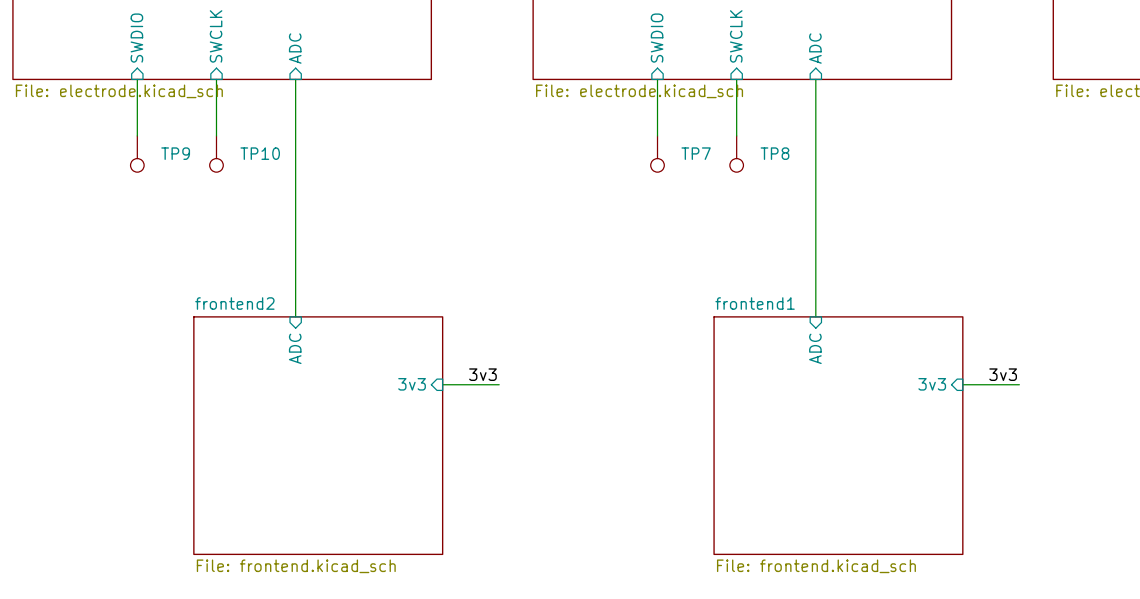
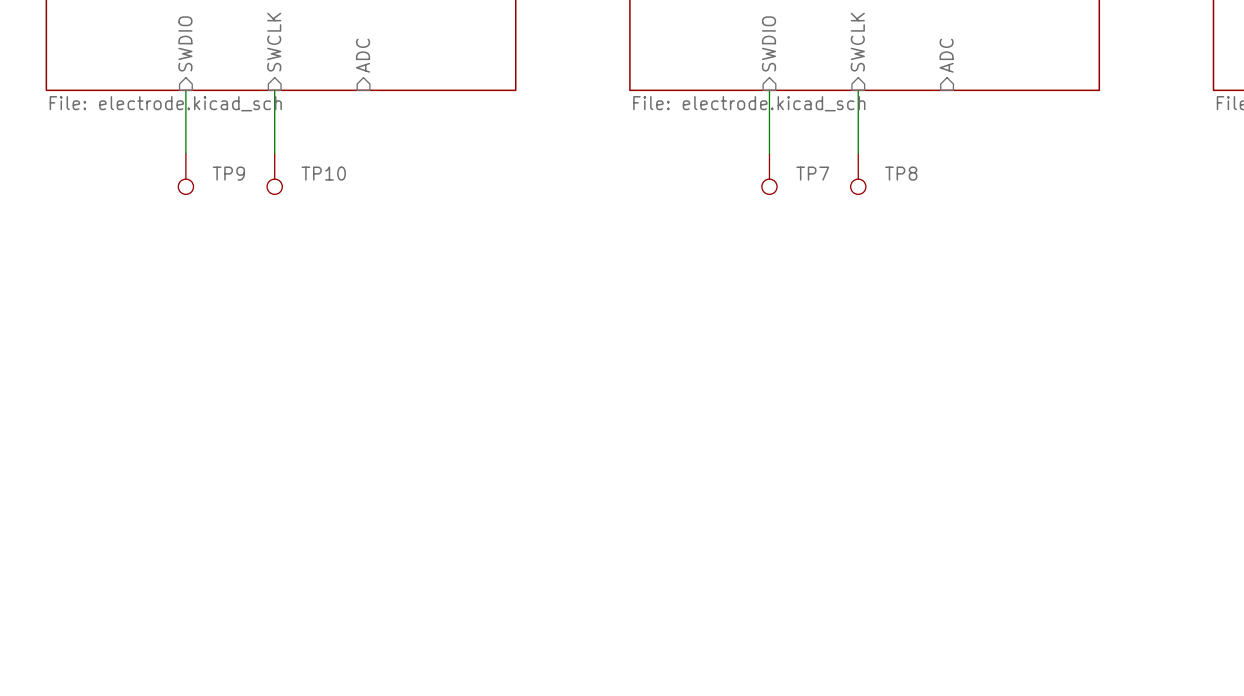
wire: (295, 79) (295, 316) -> none
wire: (815, 79) (815, 316) -> none
sheet pin: ADC (295, 348) -> none
sheet pin: ADC (815, 348) -> none
label: 3v3 (482, 374) -> none
label: 3v3 (1003, 374) -> none
sheet pin: 3v3 (412, 384) -> none
wire: (442, 384) (499, 384) -> none
sheet pin: 3v3 (932, 384) -> none
wire: (962, 384) (1019, 384) -> none
sheet frontend2: File: frontend.kicad_sch (318, 435) -> none
sheet frontend1: File: frontend.kicad_sch (838, 435) -> none

